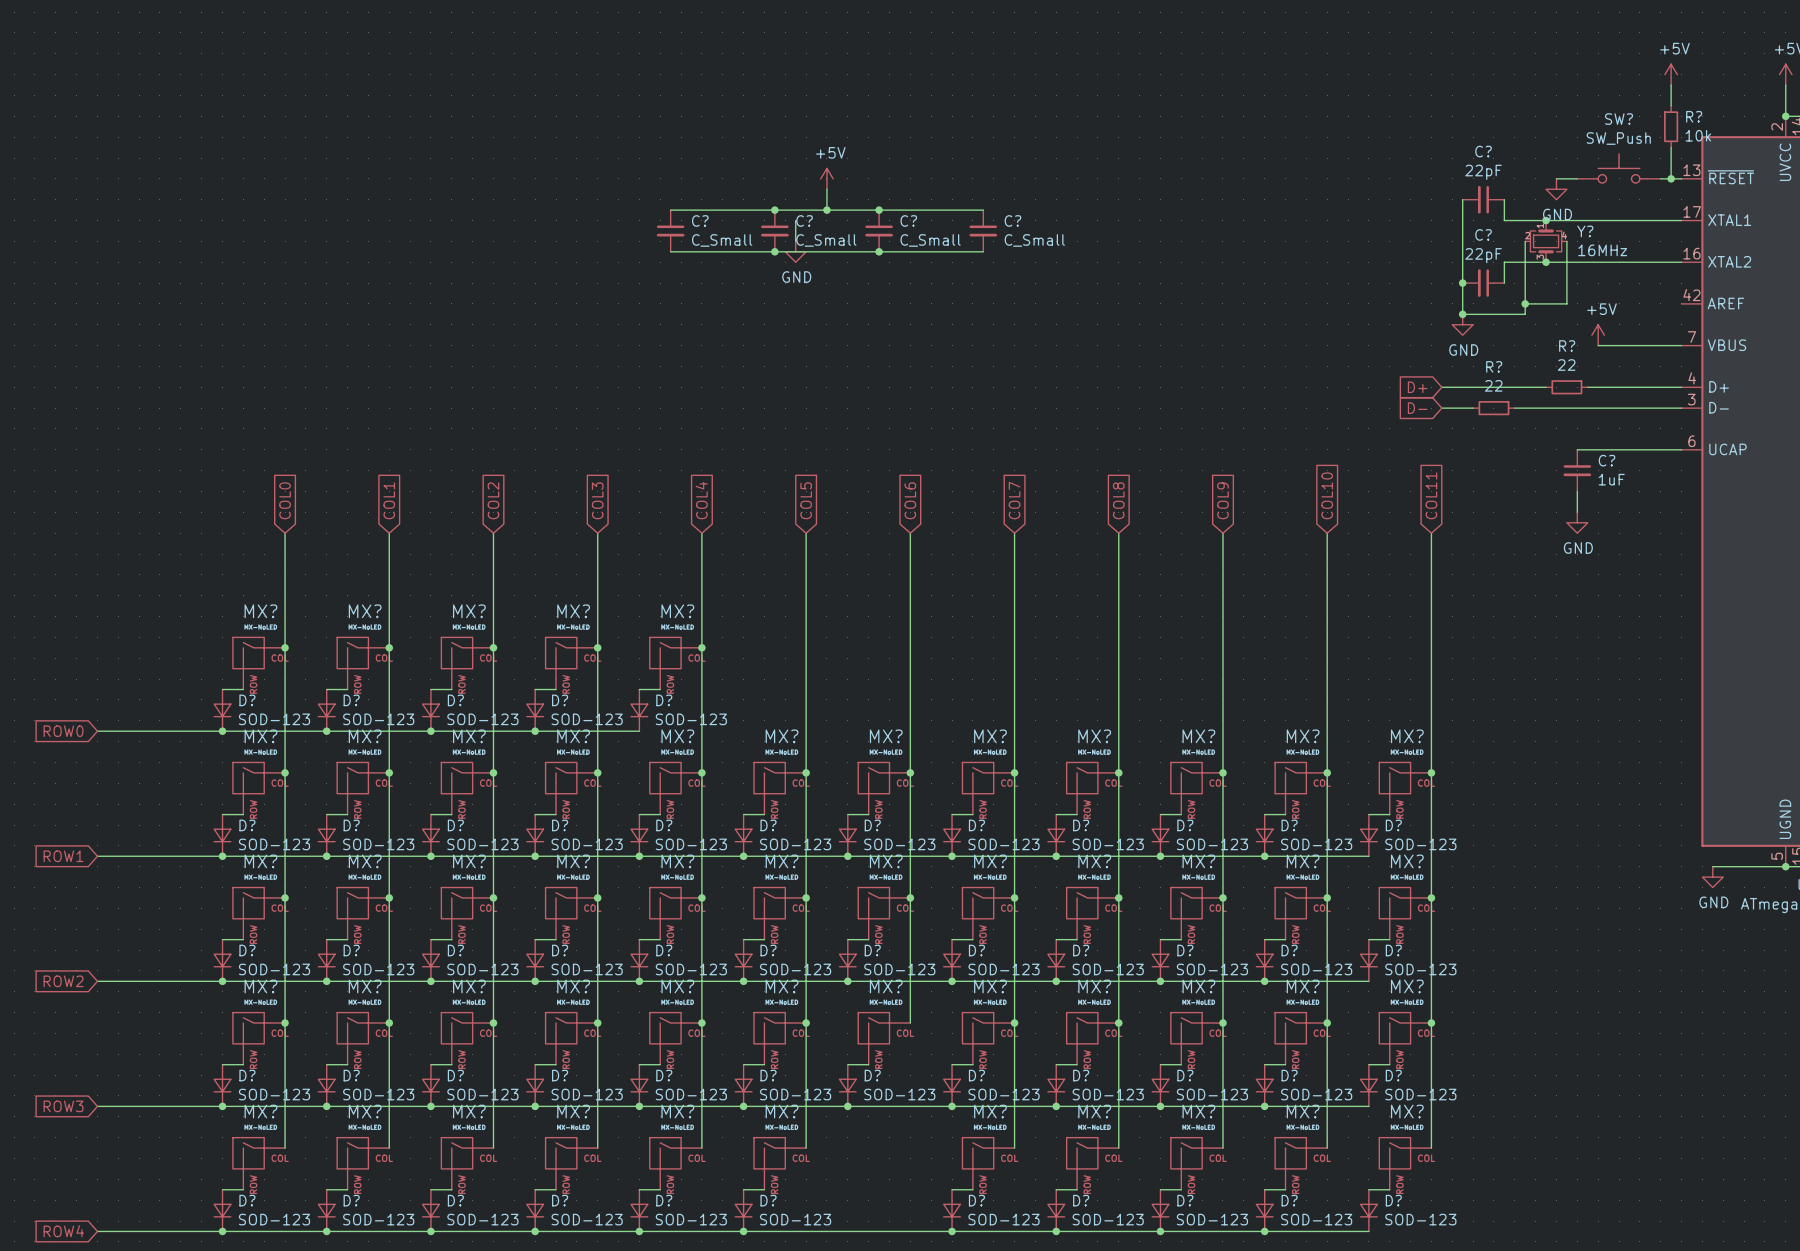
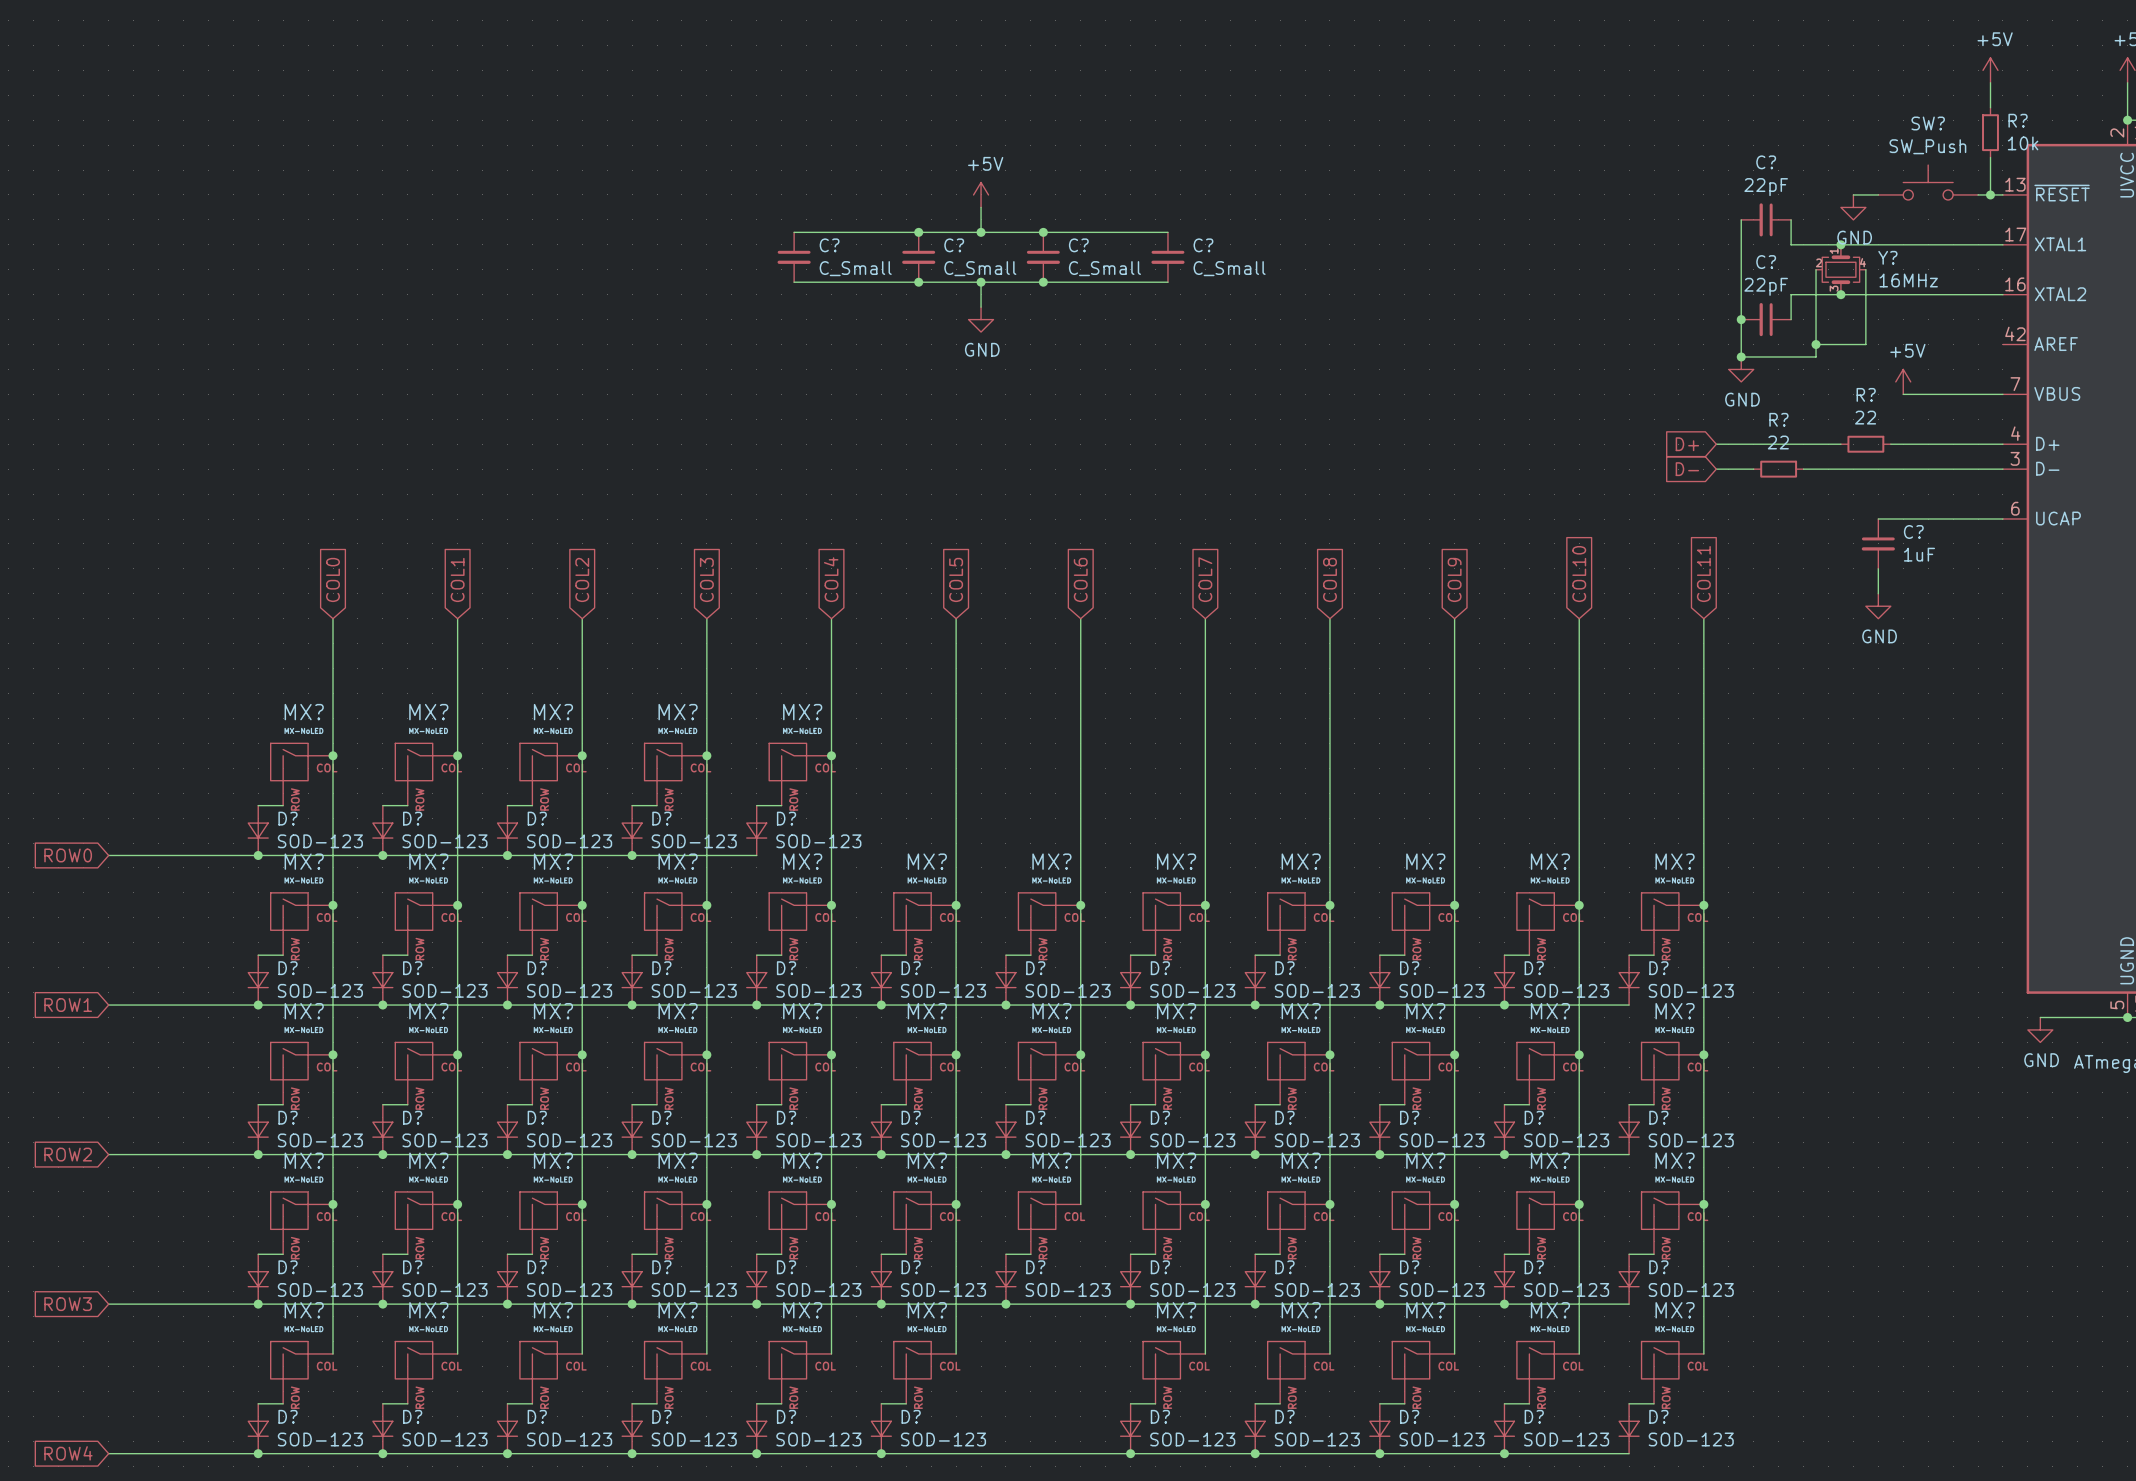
wire: (795, 220) (795, 241) -> (981, 282) (981, 307)
power symbol position: GND (795, 251) -> GND (981, 319)
junction: none -> (981, 282)

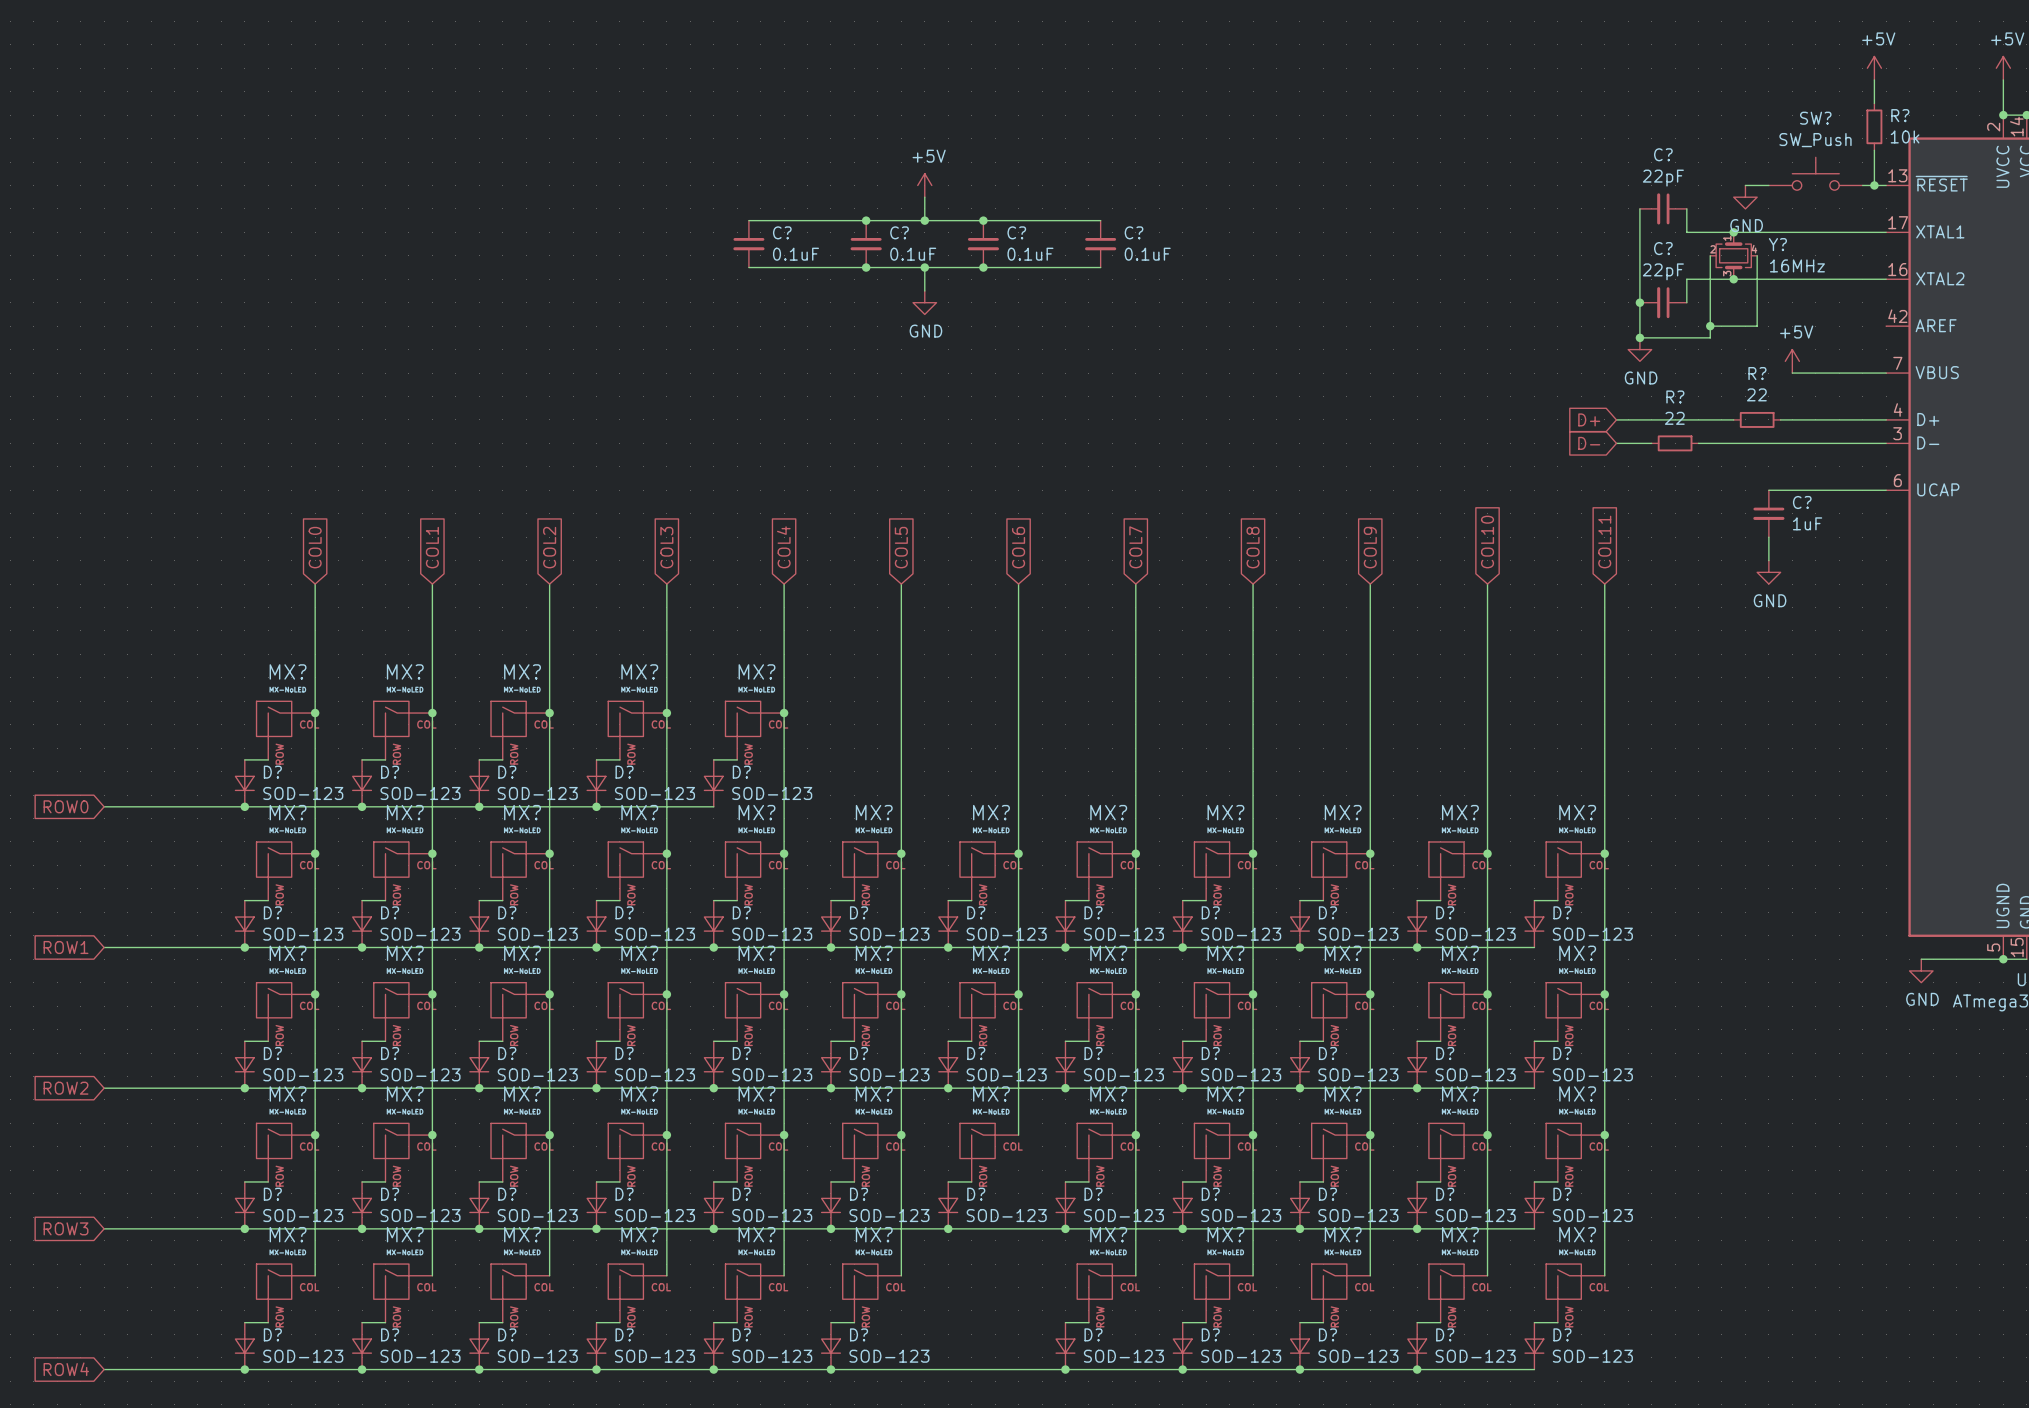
C? value: C_Small (855, 268) -> 0.1uF (795, 254)
C? value: C_Small (980, 268) -> 0.1uF (913, 254)
C? value: C_Small (1104, 268) -> 0.1uF (1030, 254)
C? value: C_Small (1229, 268) -> 0.1uF (1147, 254)

